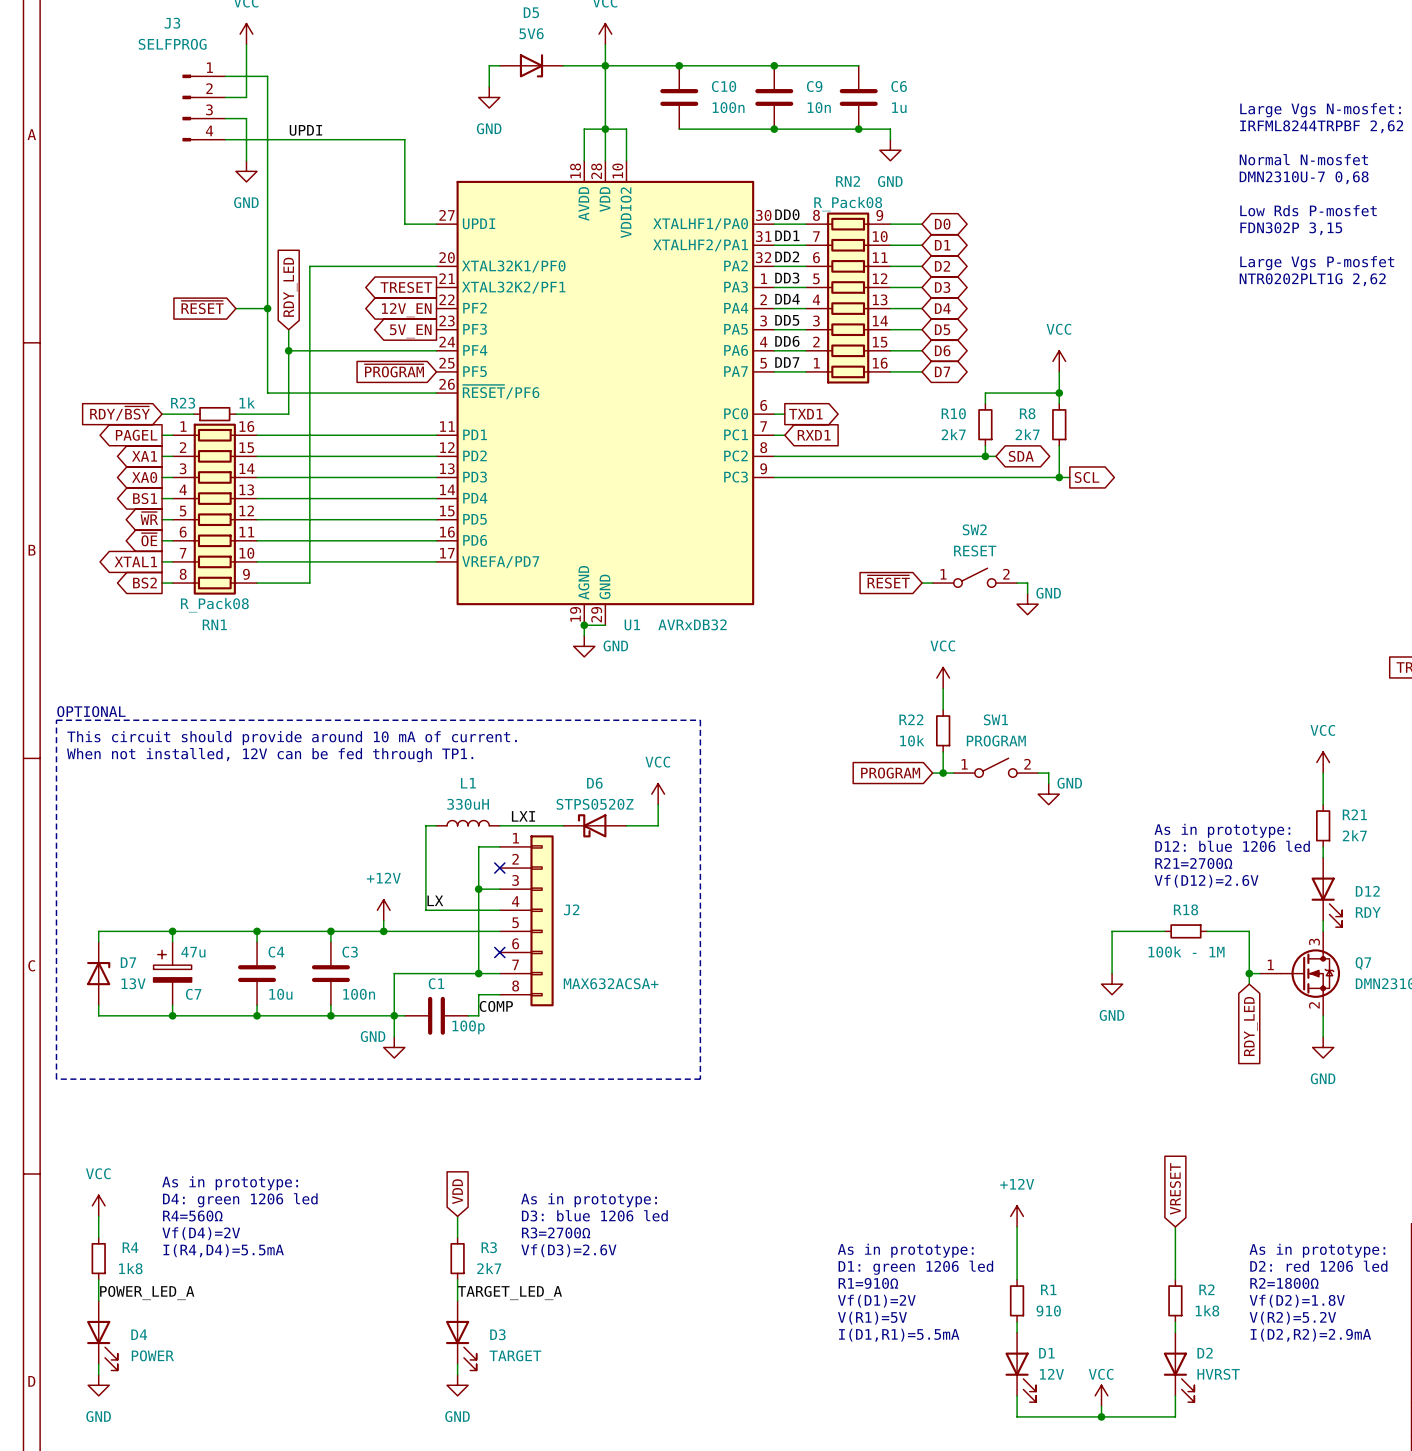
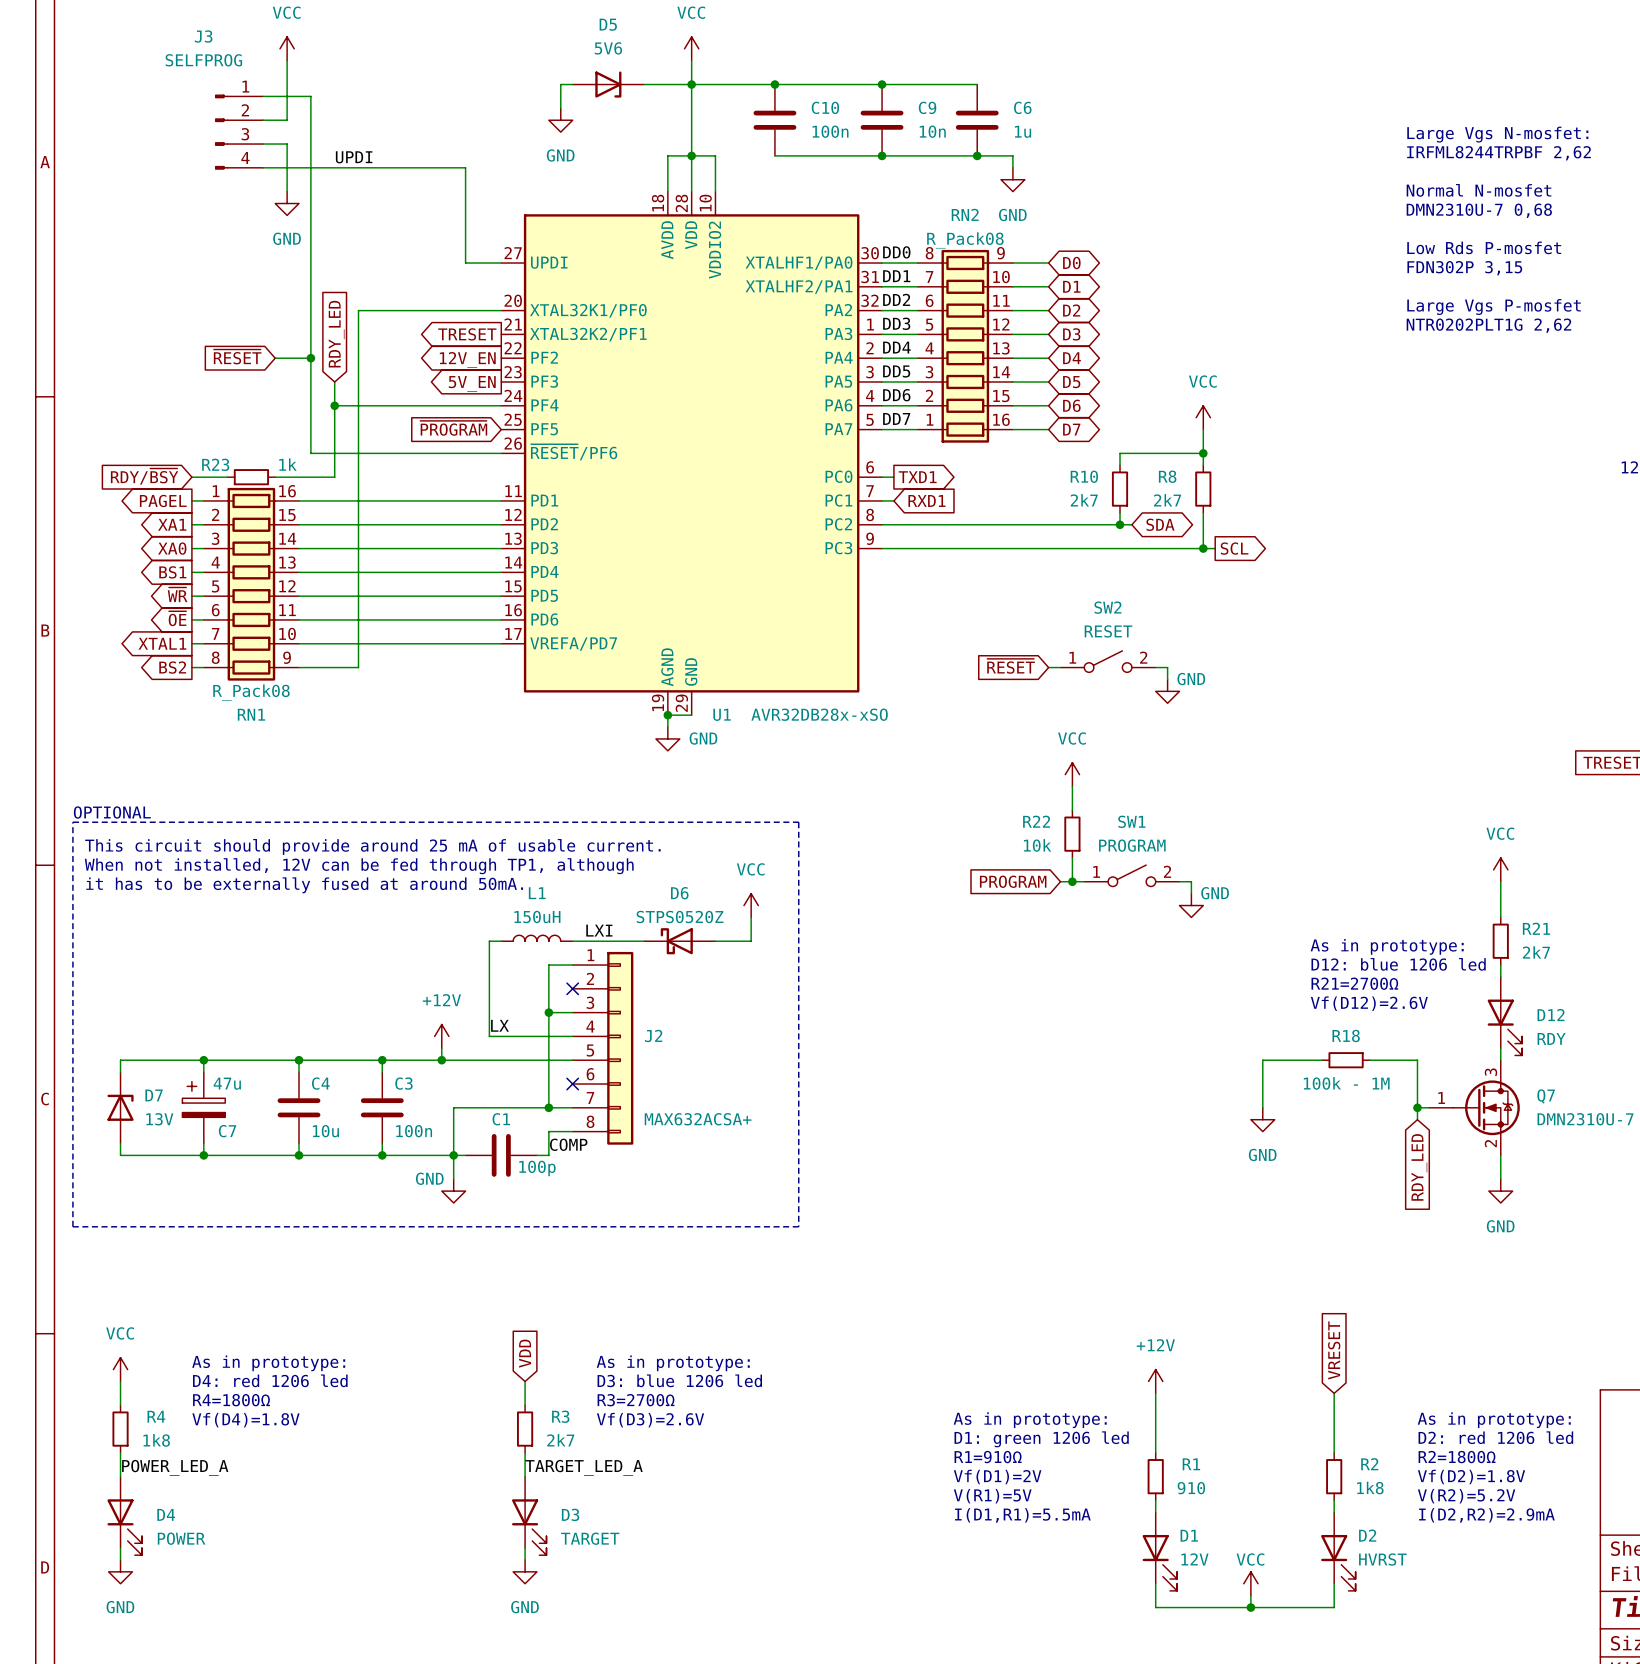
U1 value: AVRxDB32 (692, 624) -> AVR32DB28x-xSO (819, 714)
text: This circuit should provide around 10 mA of current. (292, 738) -> This circuit should provide around 25 mA of usable current. (372, 846)
text: When not installed, 12V can be fed through TP1. (270, 755) -> When not installed, 12V can be fed through TP1, although (359, 866)
text: none -> it has to be externally fused at around 50mA. (304, 885)
L1 value: 330uH (468, 804) -> 150uH (537, 916)
text: As in prototype: (230, 1183) -> none
text: D4: green 1206 led (240, 1200) -> As in prototype: (268, 1363)
text: R4=560Ω (192, 1215) -> D4: red 1206 led (270, 1380)
text: Vf(D4)=2V (201, 1233) -> R4=1800Ω (231, 1400)
text: I(R4,D4)=5.5mA (223, 1250) -> Vf(D4)=1.8V (245, 1420)

